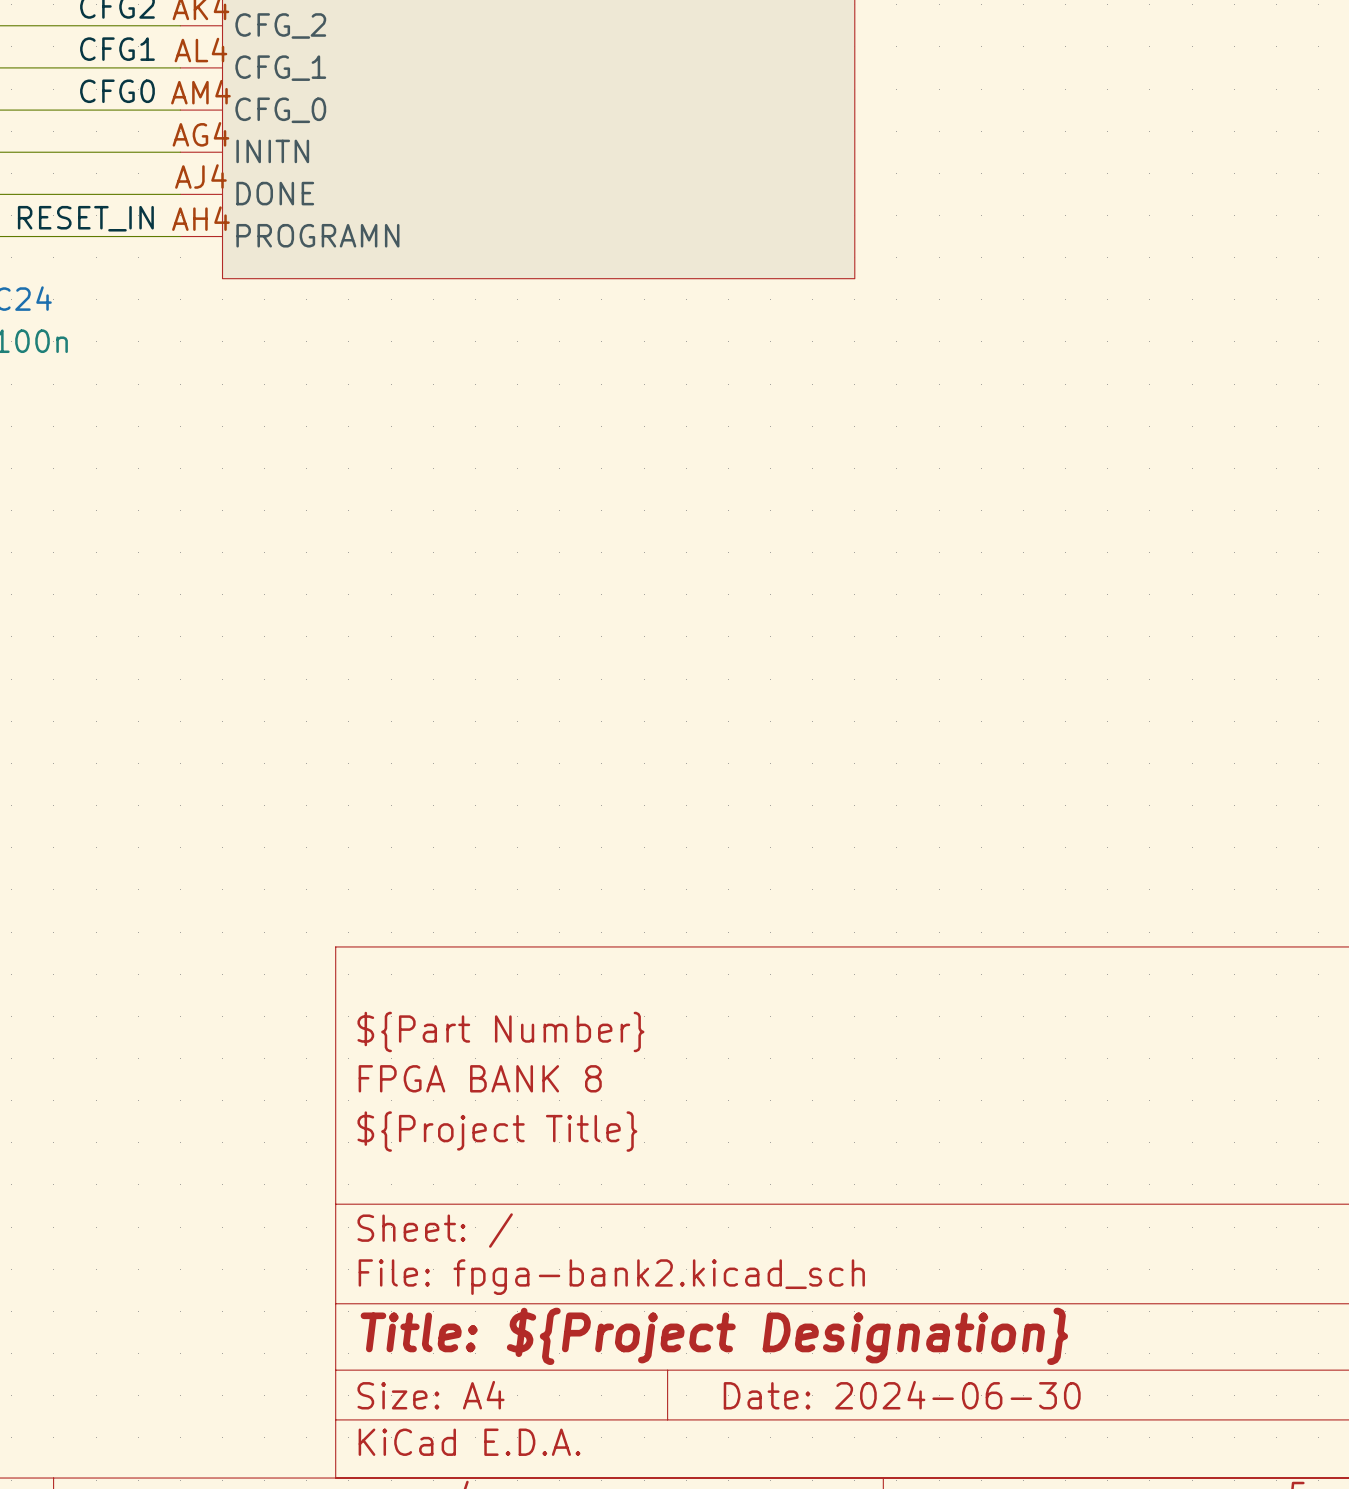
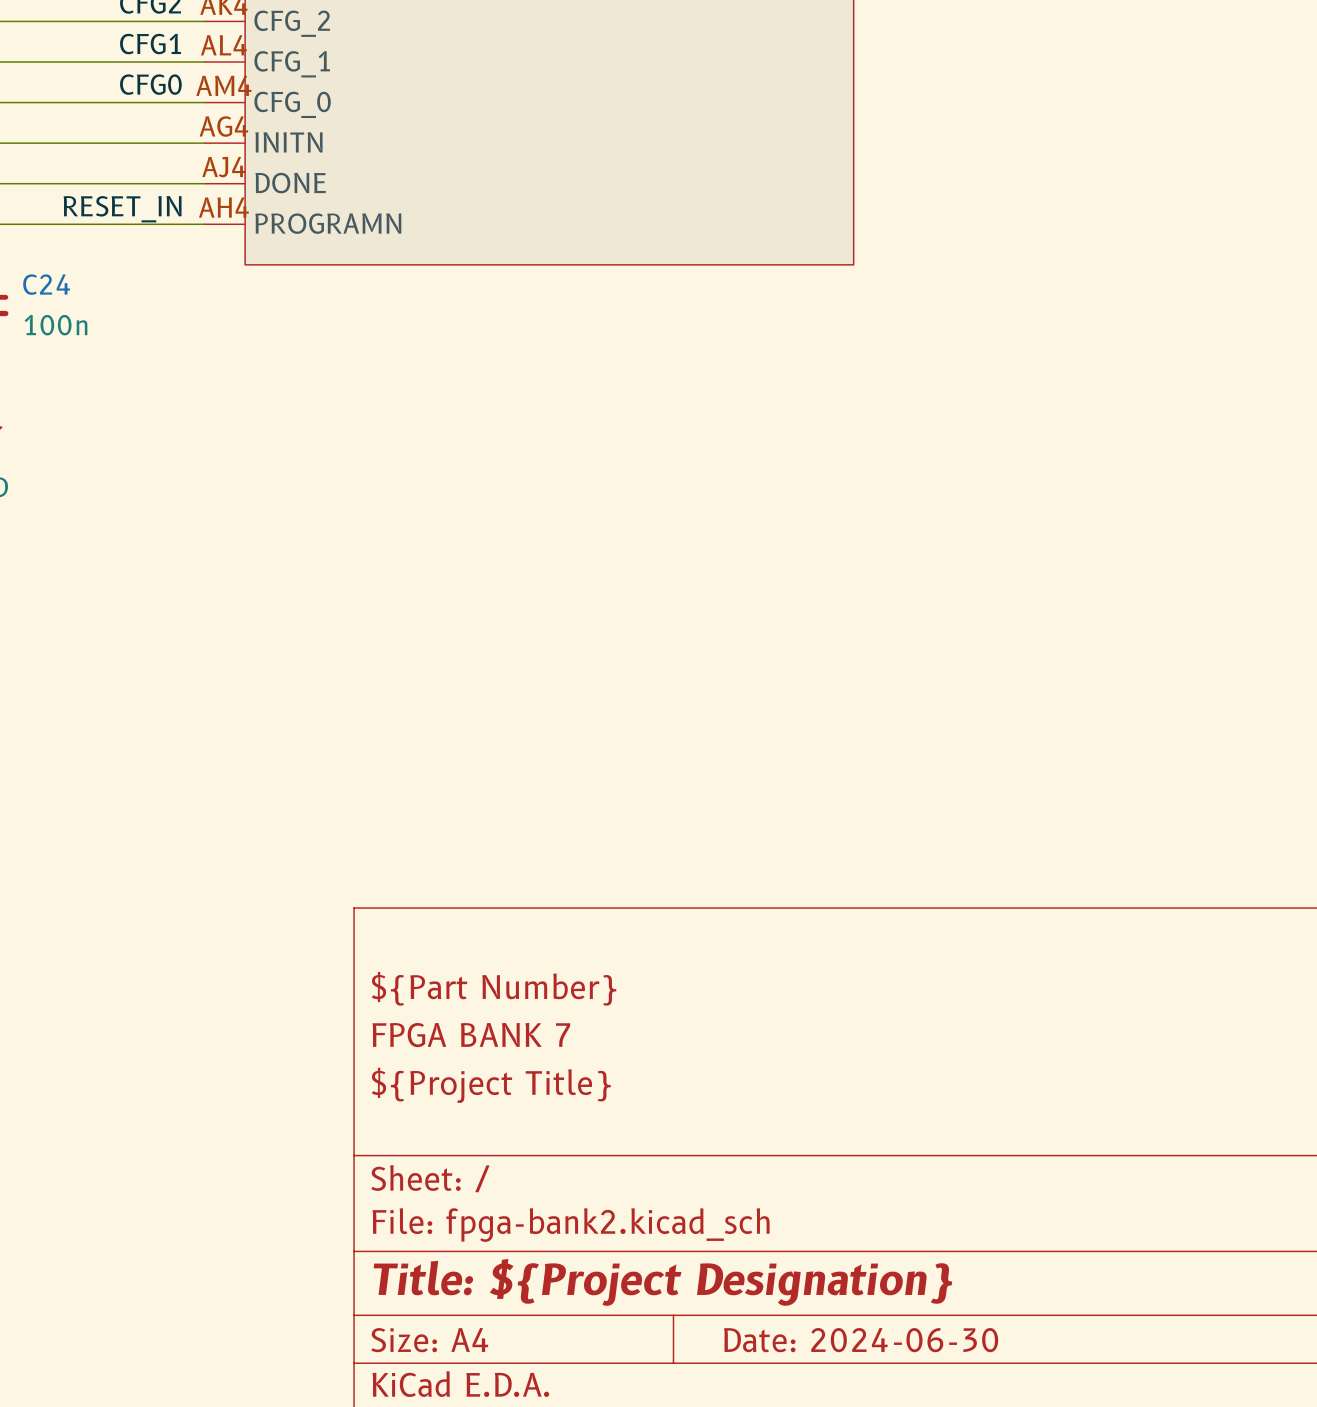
title block: FPGA BANK 8 (480, 1078) -> FPGA BANK 7 (471, 1035)

